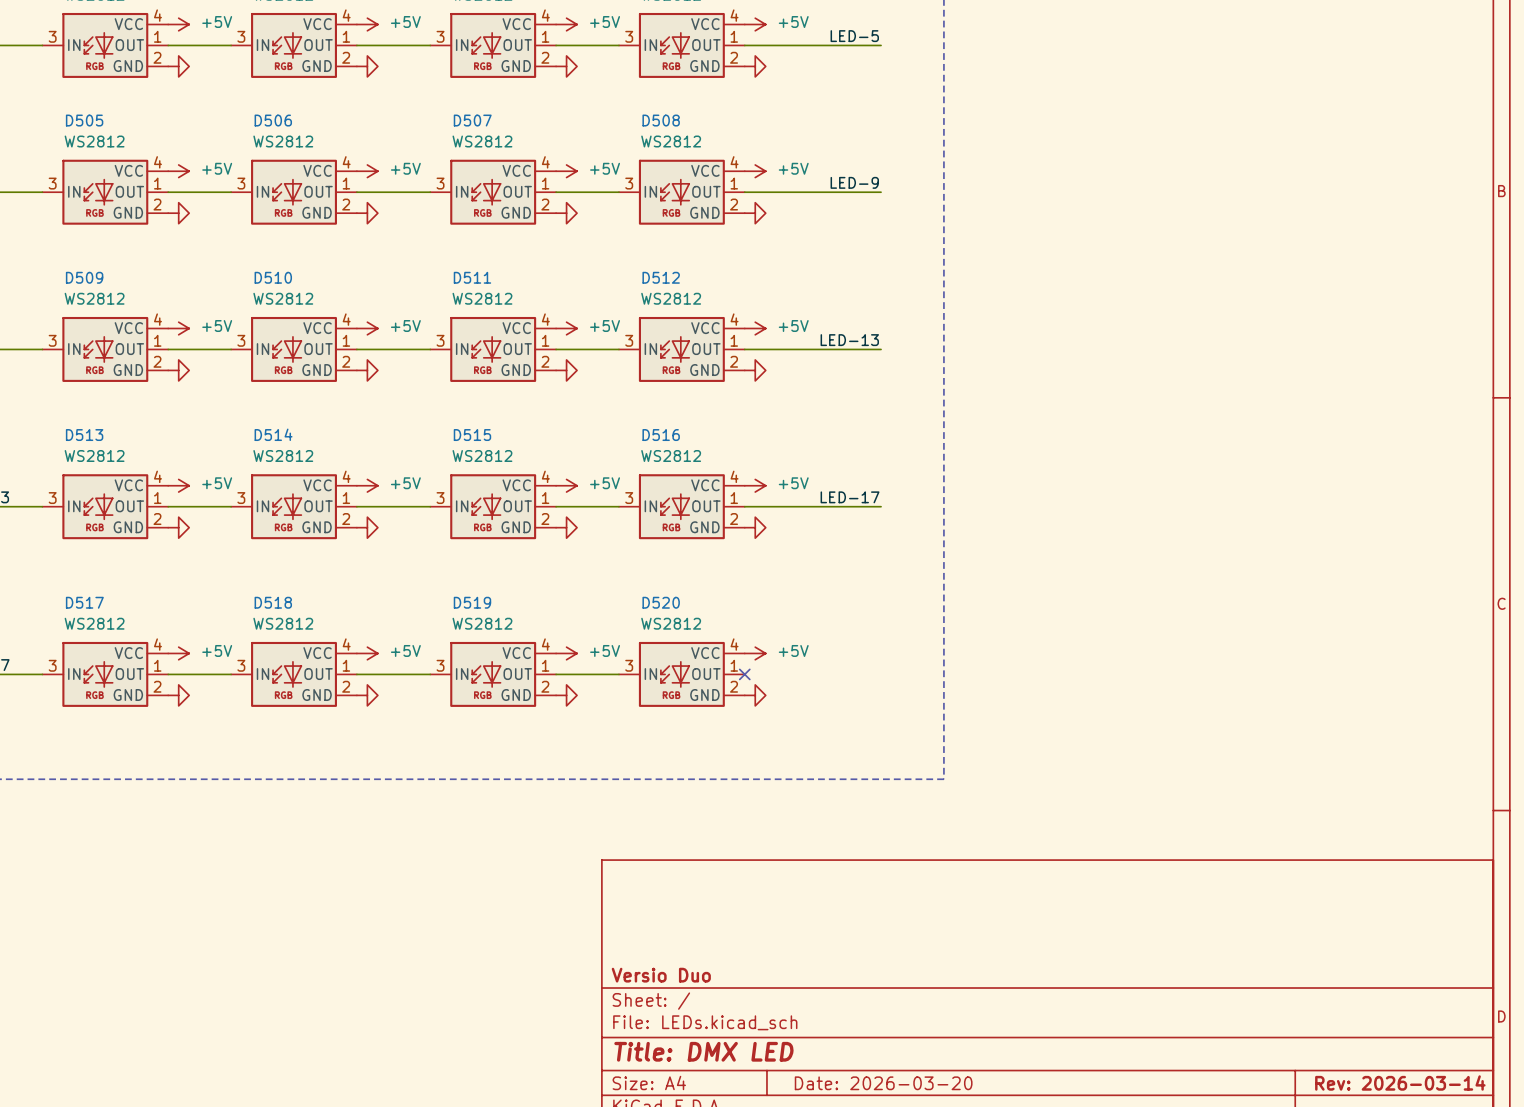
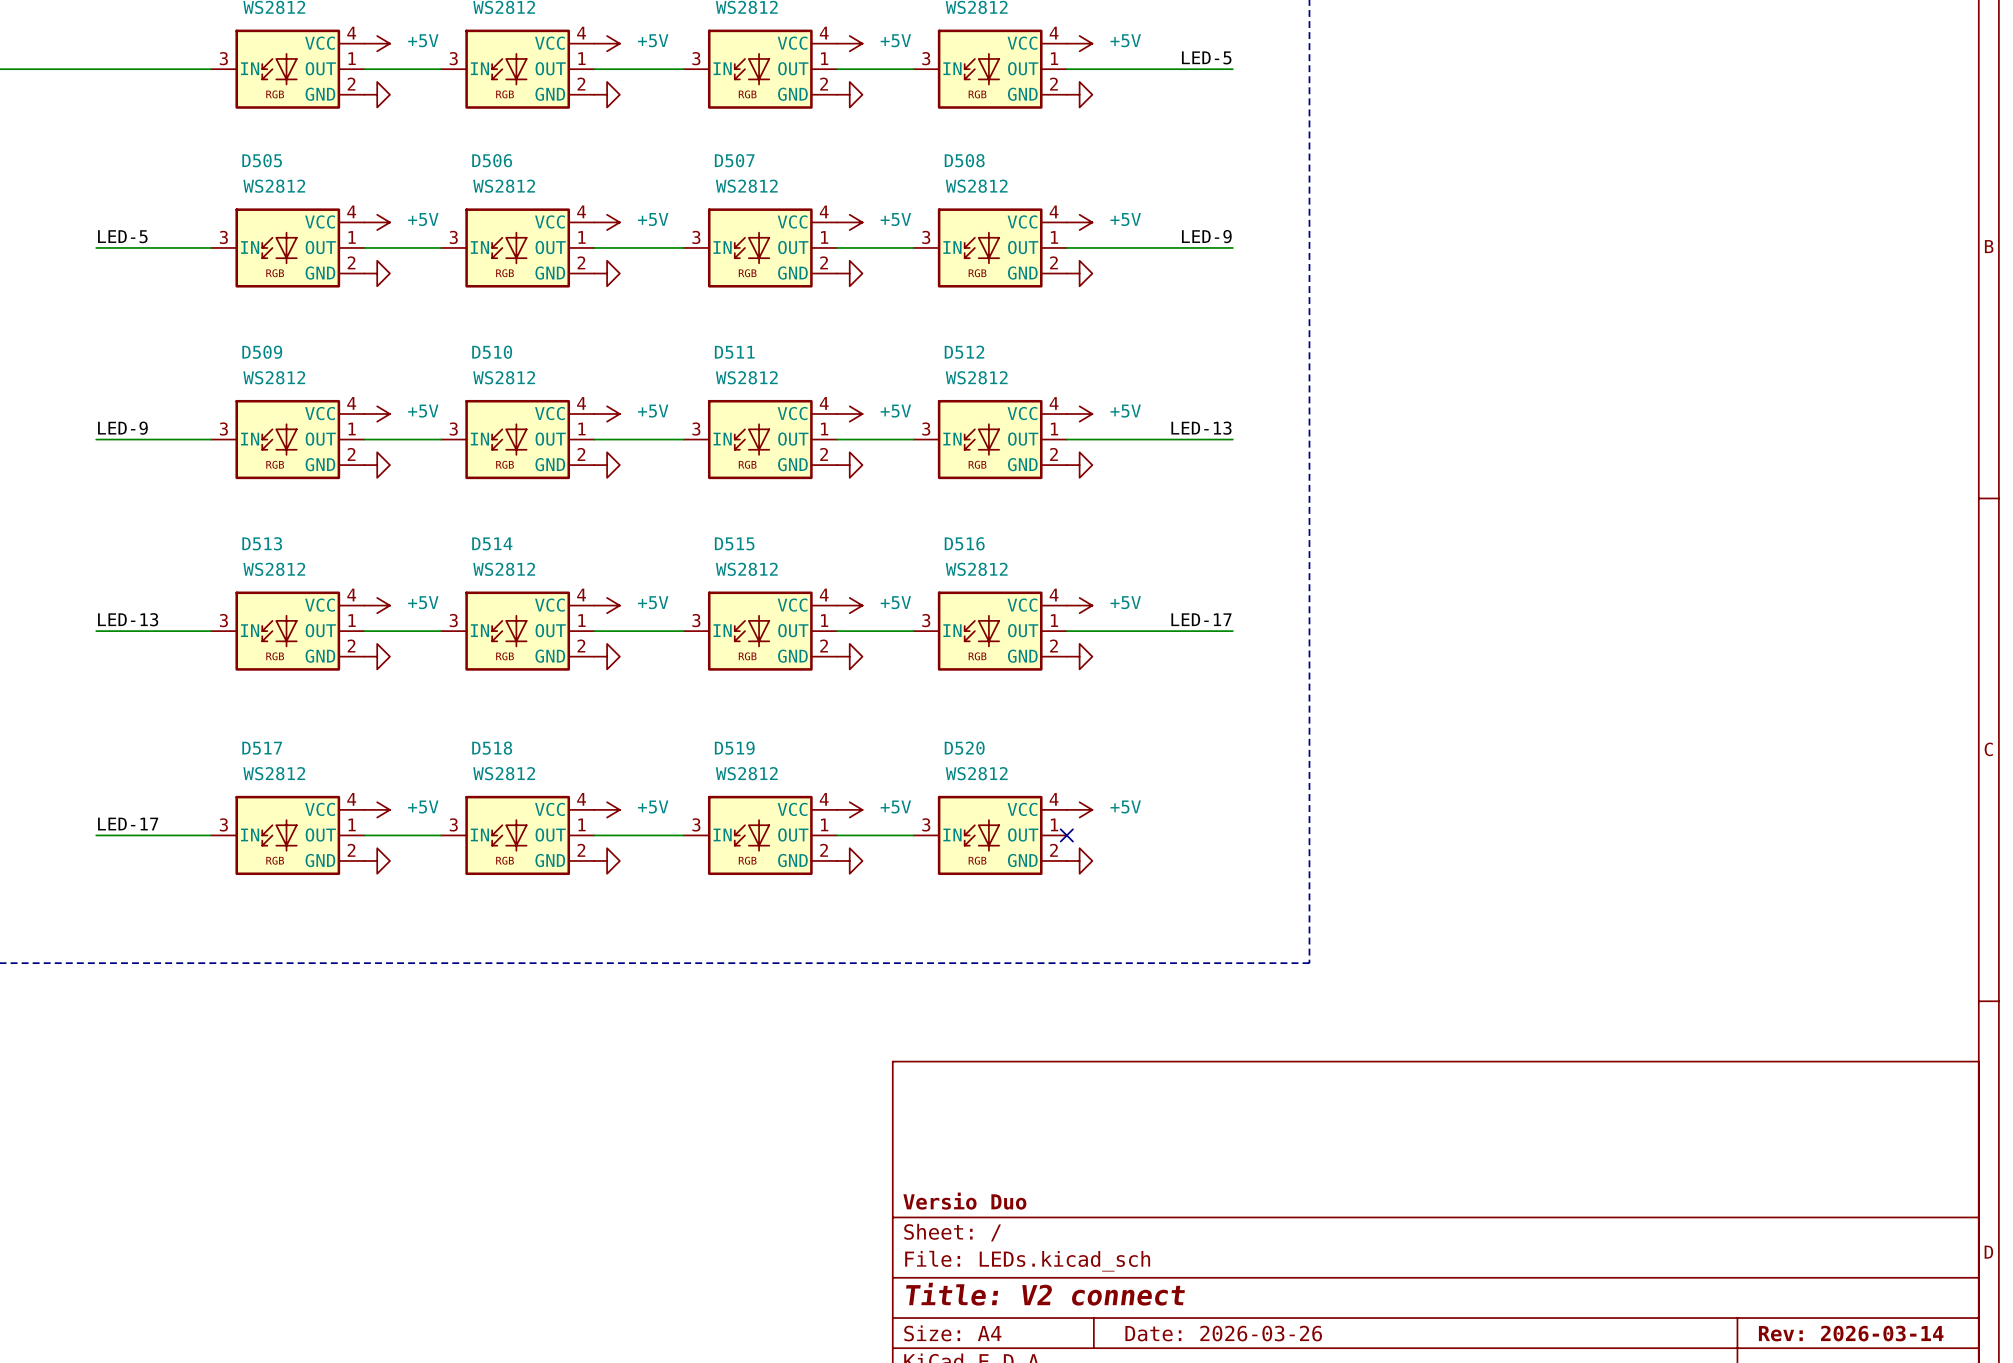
title block: Title: DMX LED (703, 1051) -> Title: V2 connect (1045, 1294)
title block: Date: 2026-03-20 (883, 1083) -> Date: 2026-03-26 (1223, 1333)

